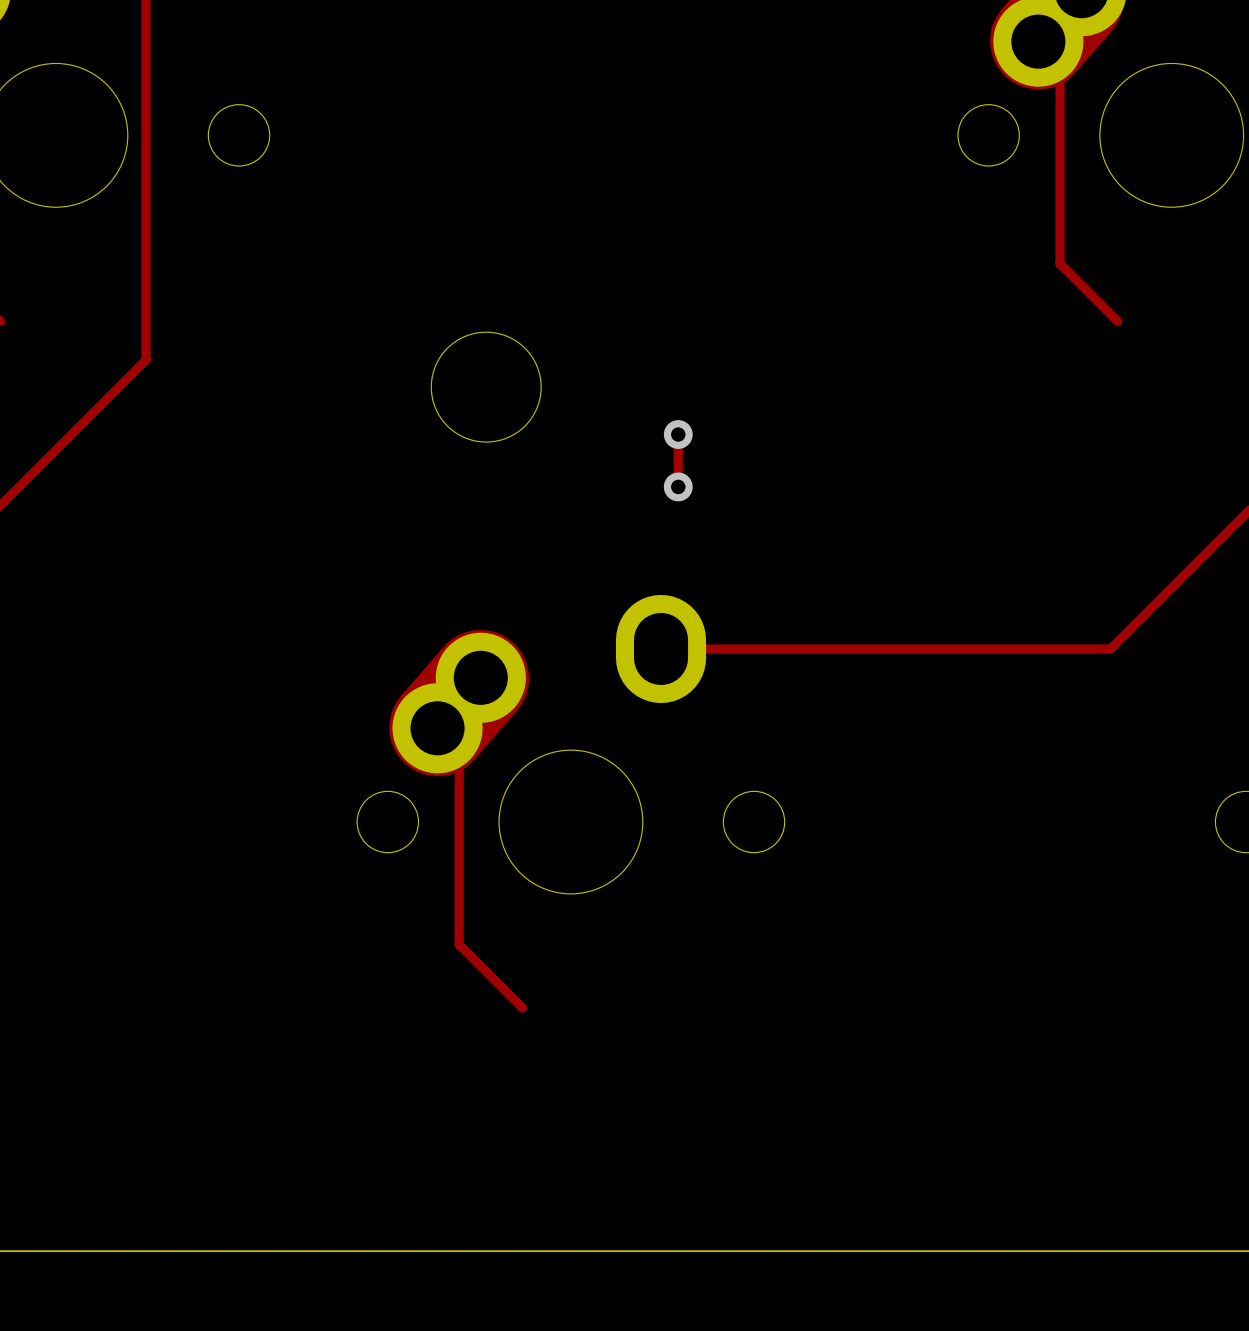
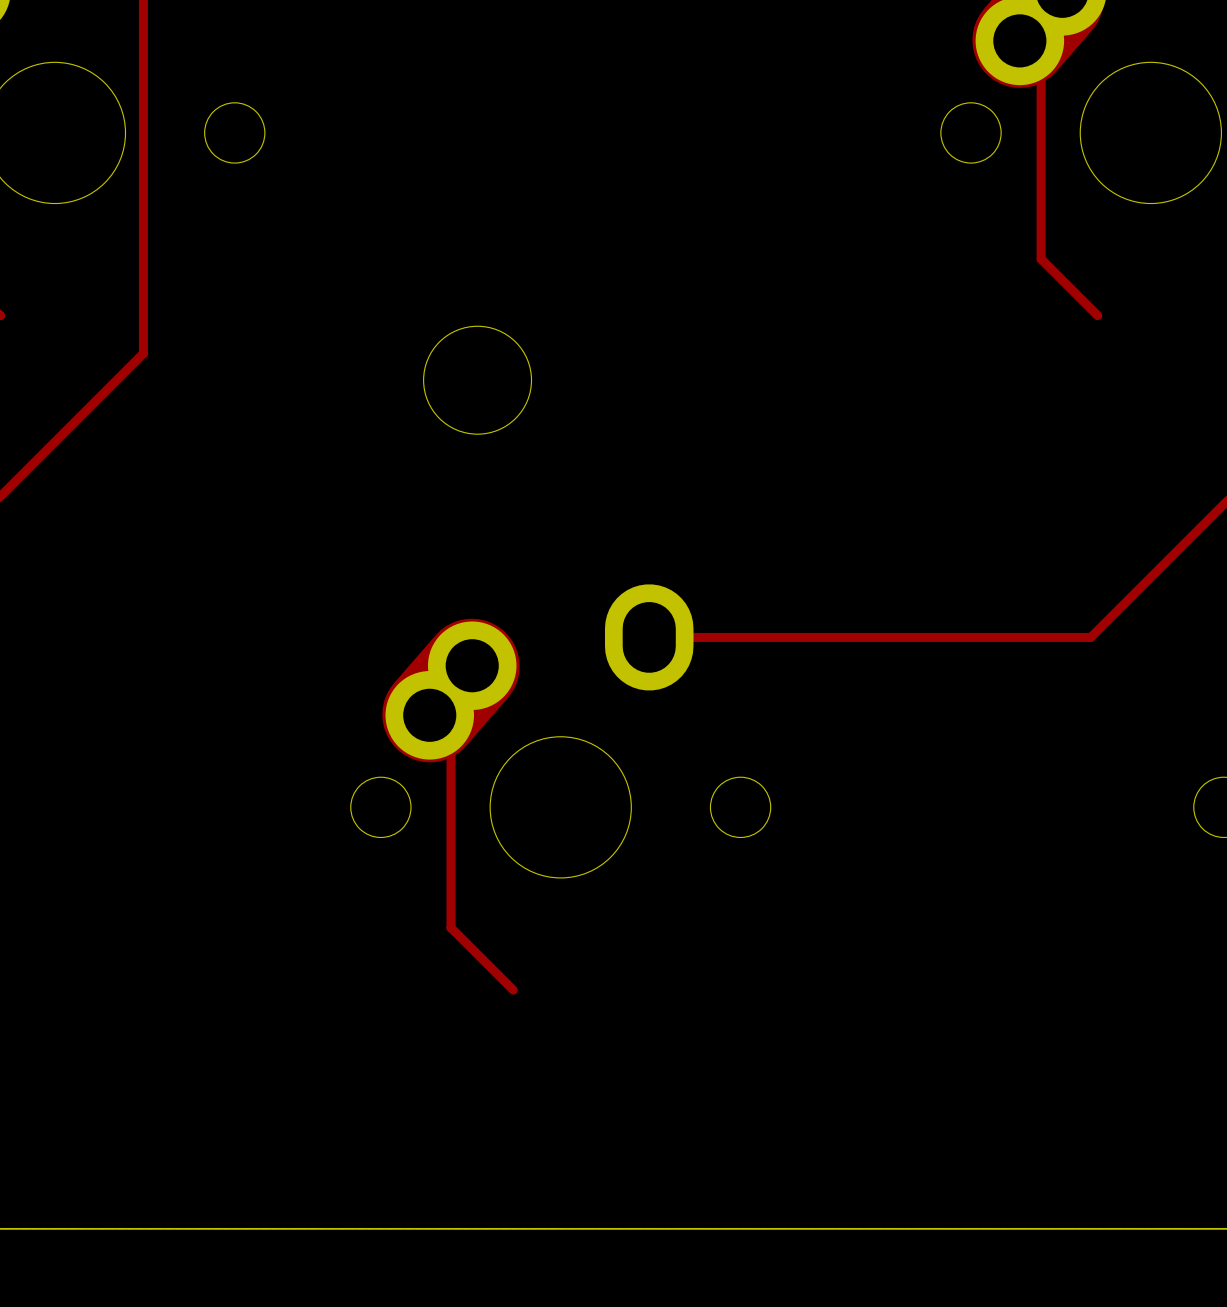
track: (678, 434) (678, 486) -> none
via: (678, 434) -> none
via: (678, 486) -> none

